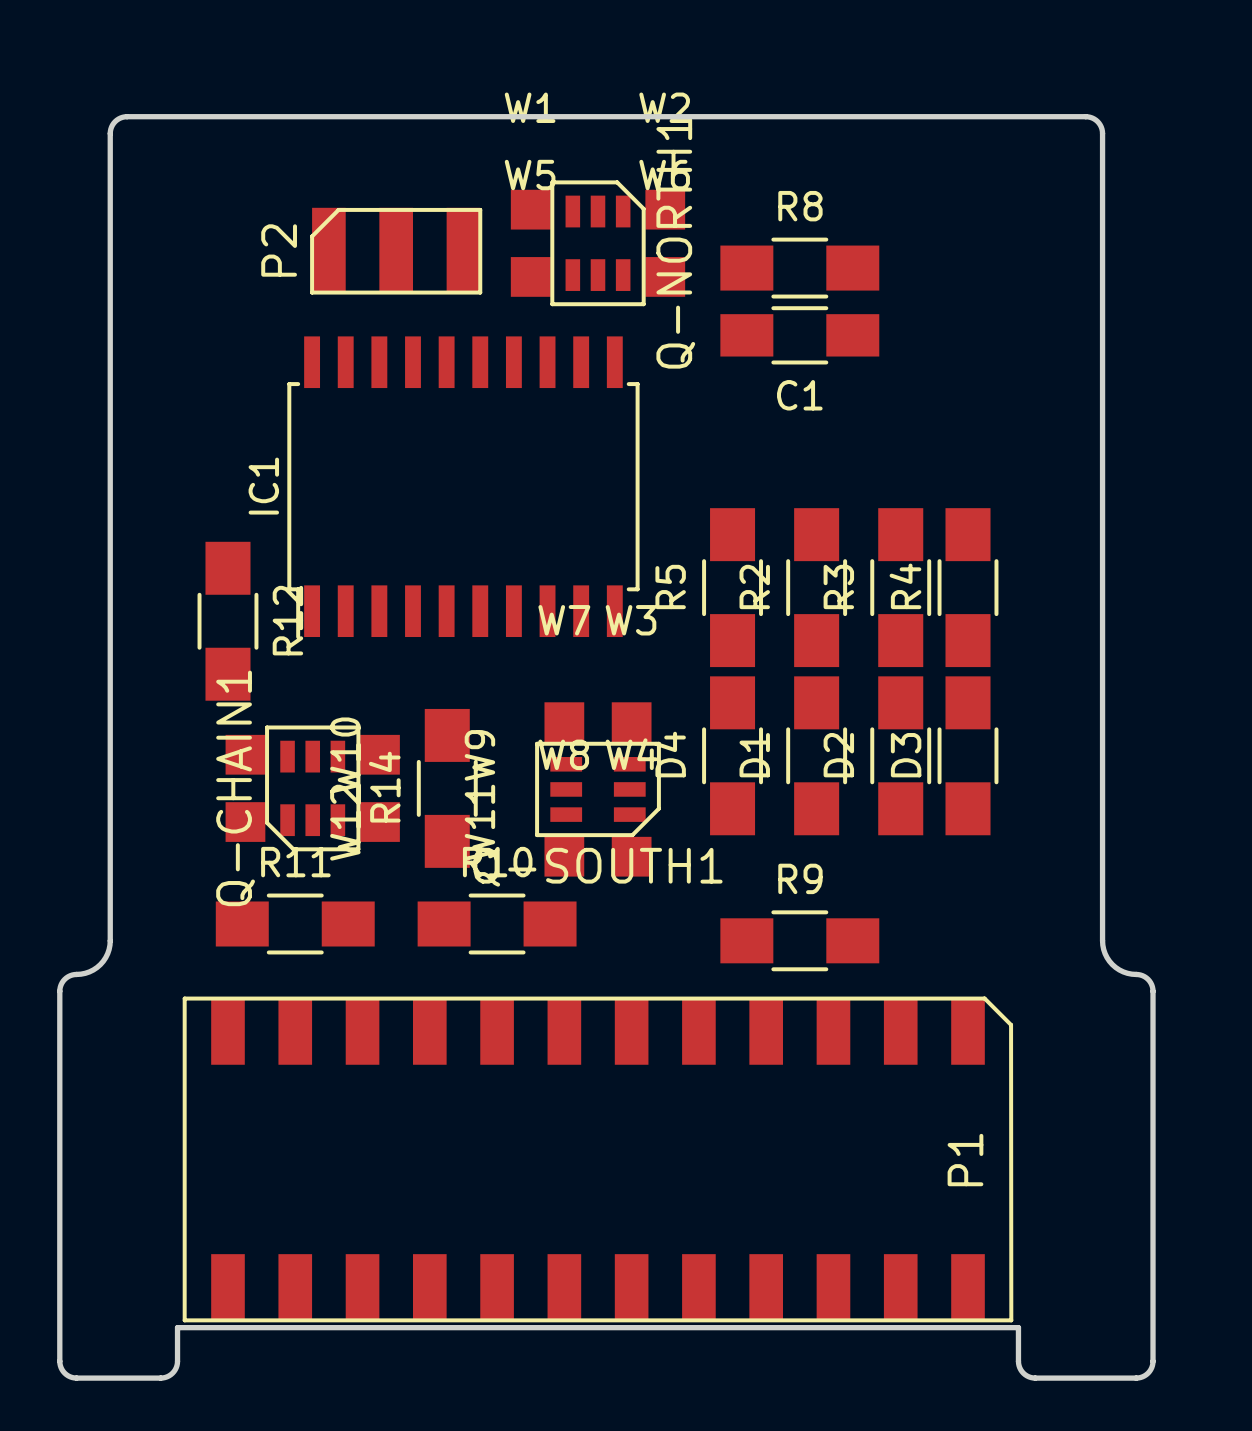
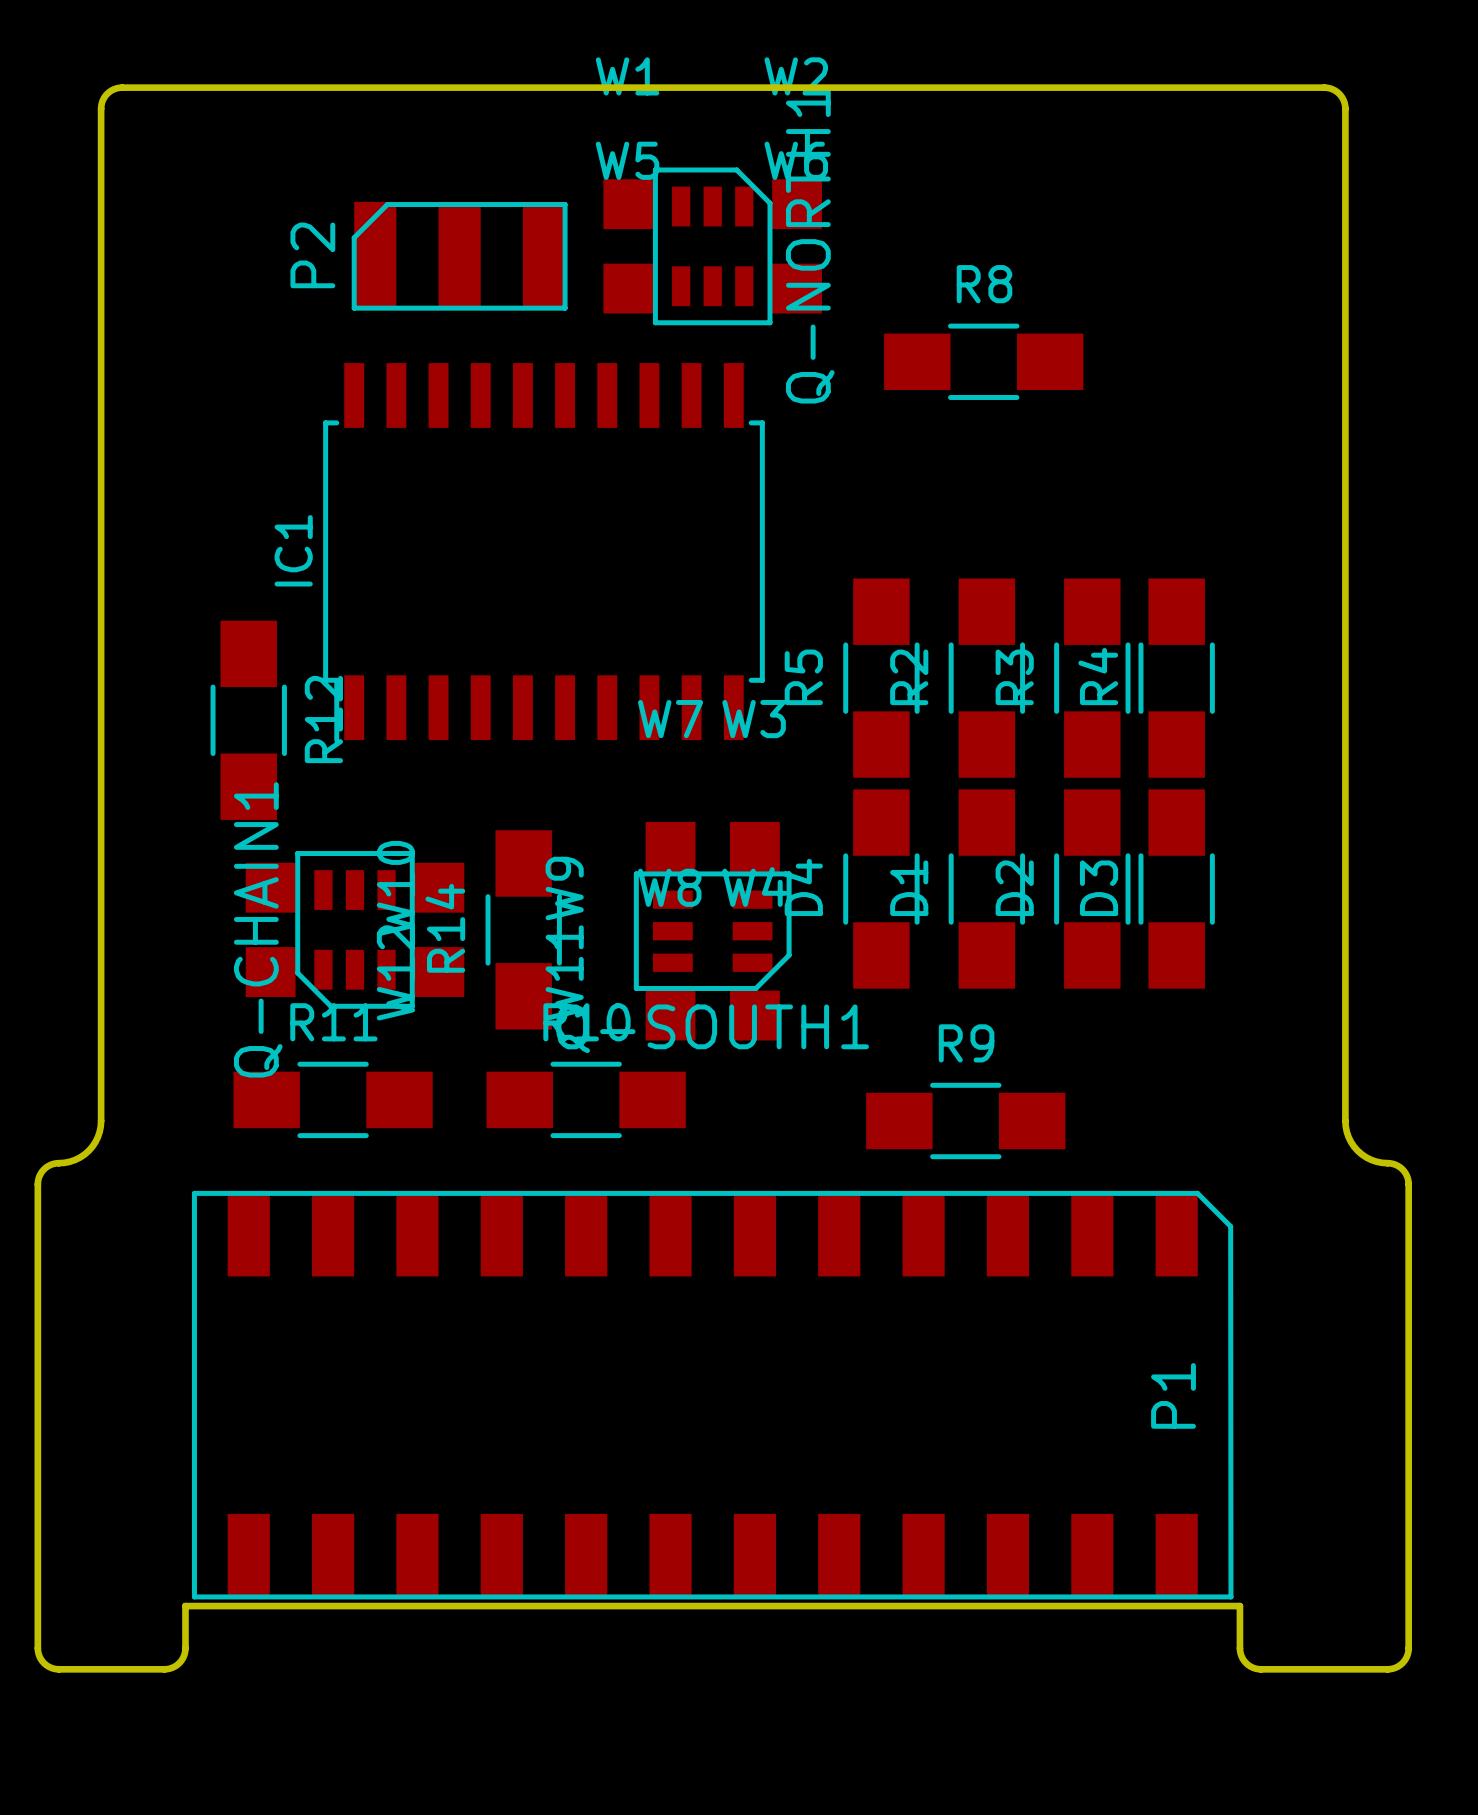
R8 position: (799, 268) -> (983, 361)
C1: (799, 335) -> none

